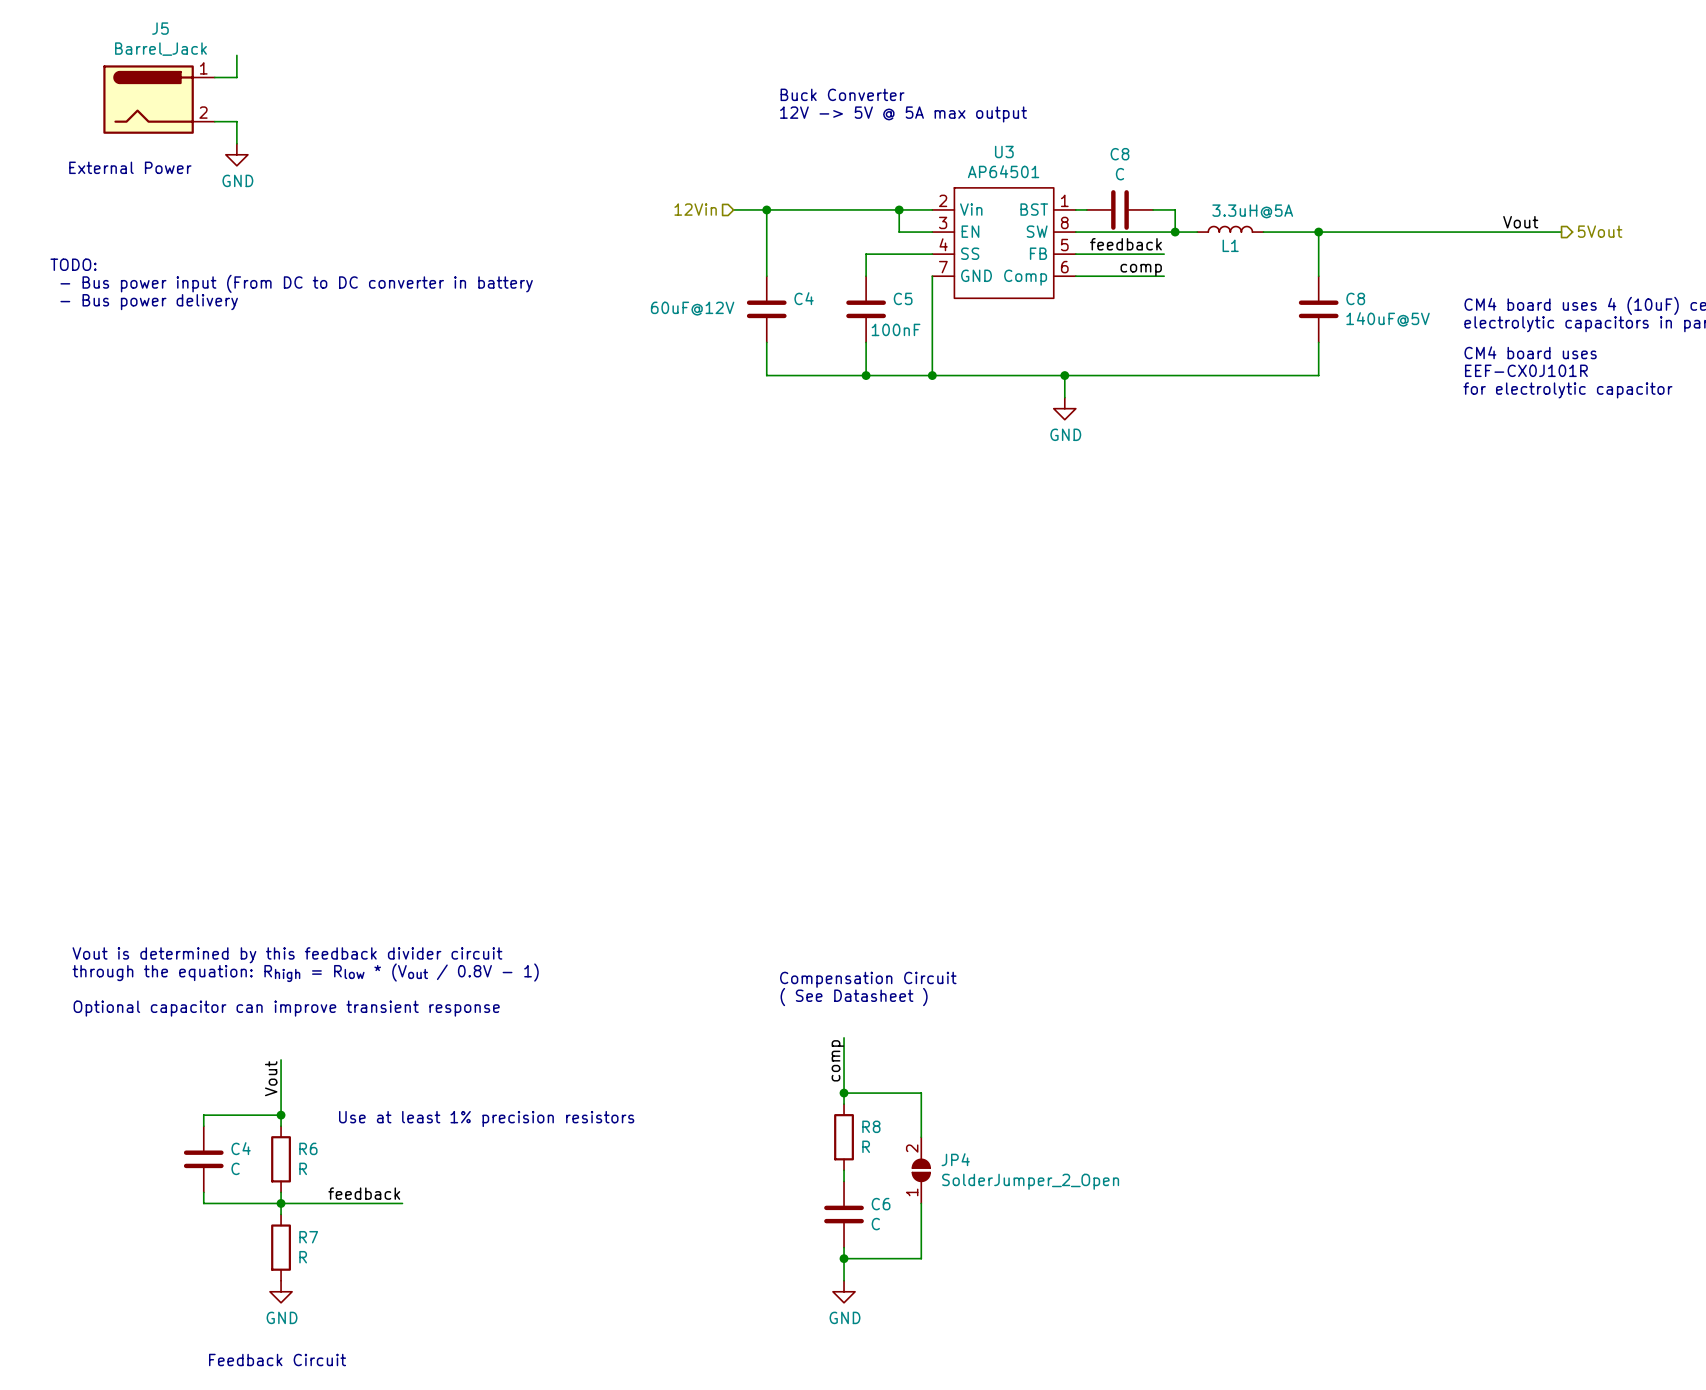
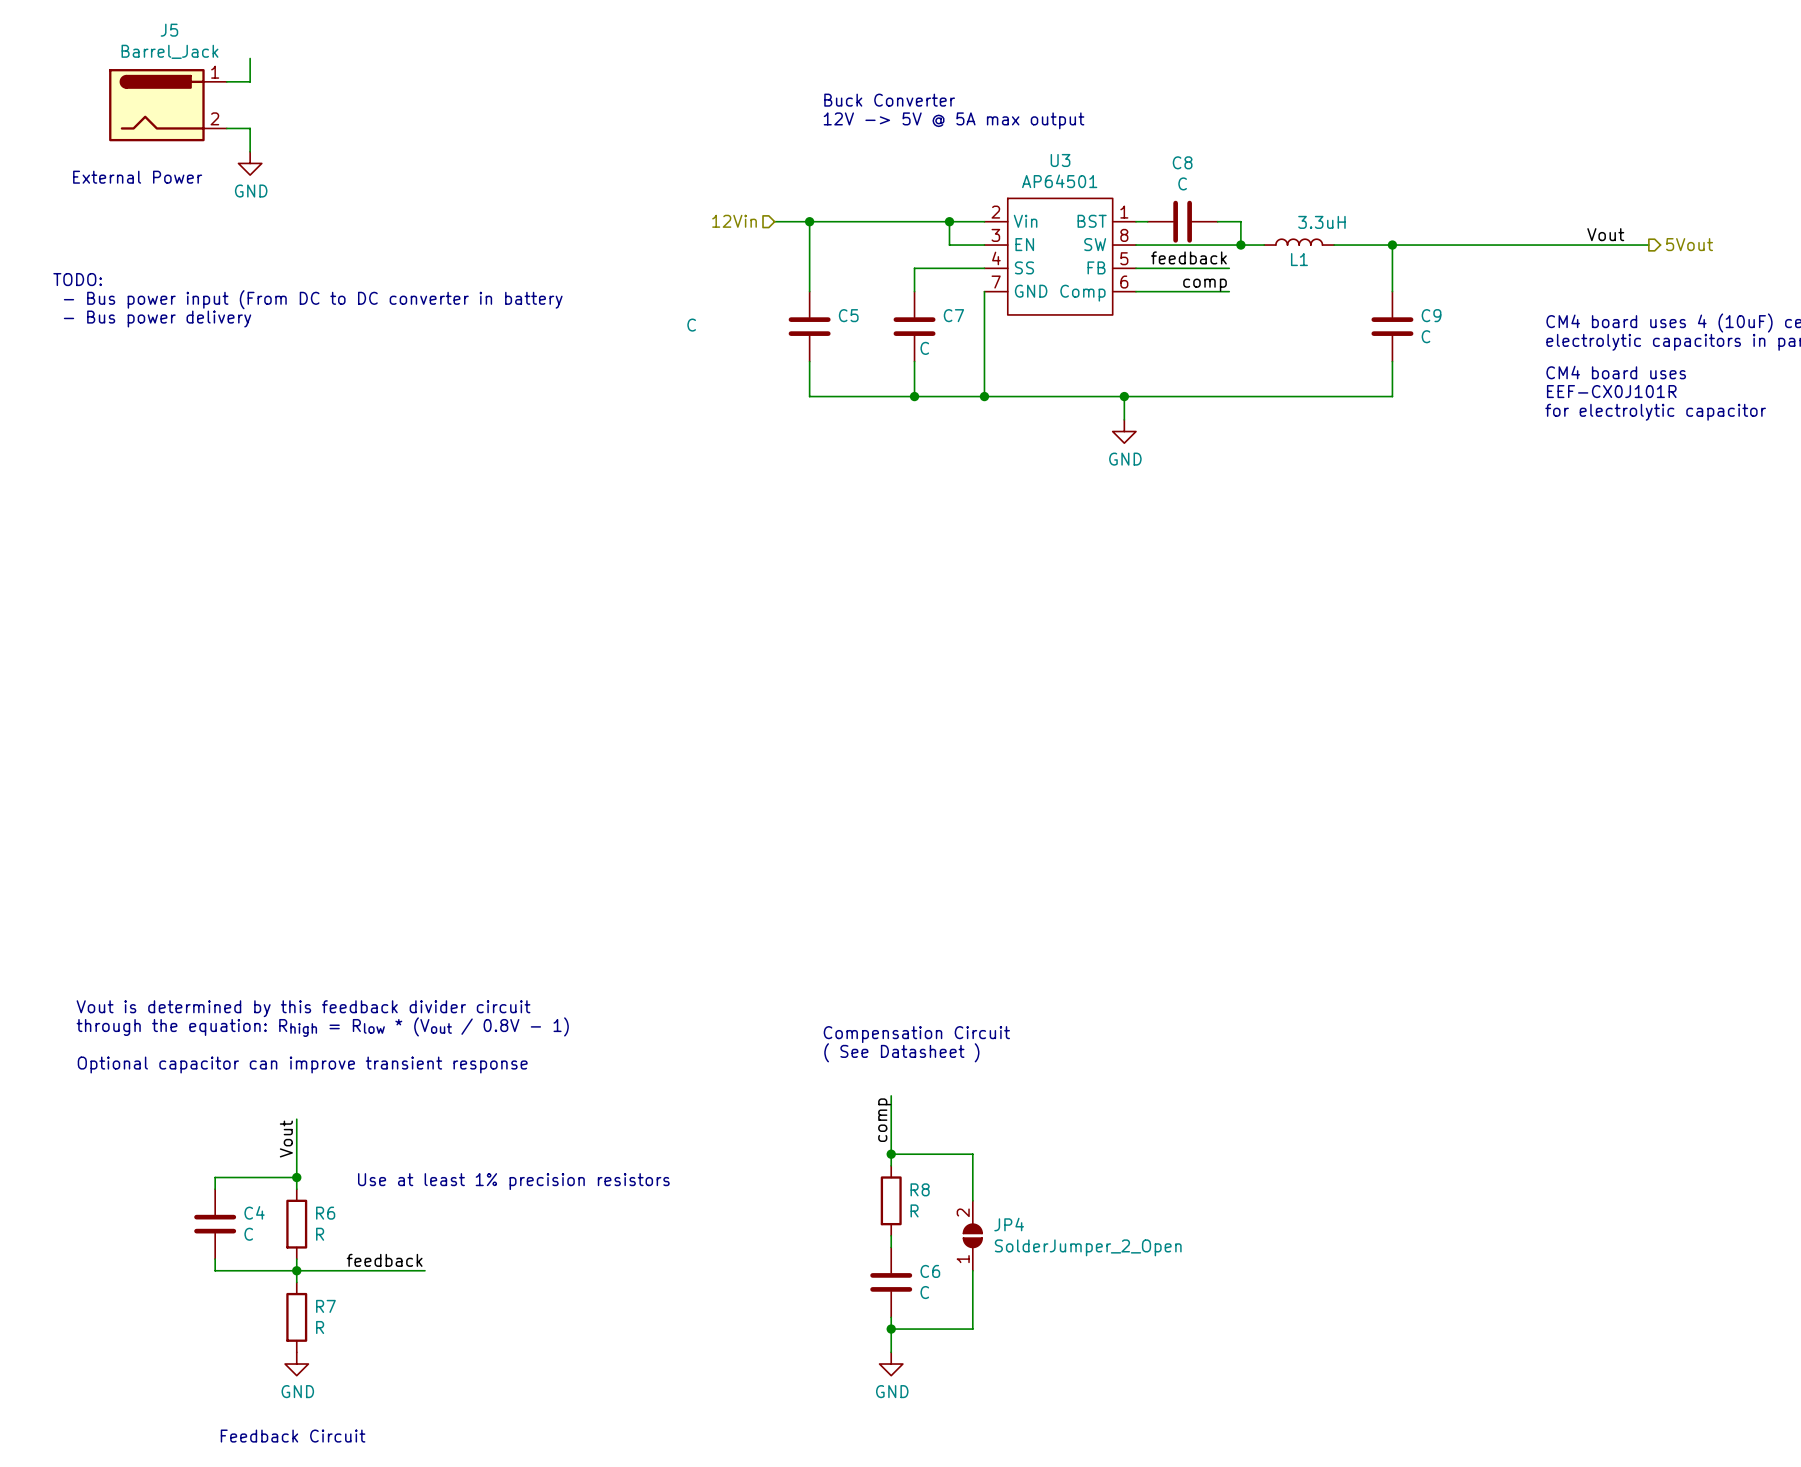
L1 value: 3.3uH@5A (1252, 211) -> 3.3uH (1321, 222)
C4 name: C4 (804, 298) -> C5 (848, 315)
C5 name: C5 (903, 298) -> C7 (953, 315)
C8 name: C8 (1355, 298) -> C9 (1431, 315)
C4 value: 60uF@12V (692, 308) -> C (691, 325)
C8 value: 140uF@5V (1388, 319) -> C (1425, 336)
C5 value: 100nF (896, 329) -> C (924, 348)

